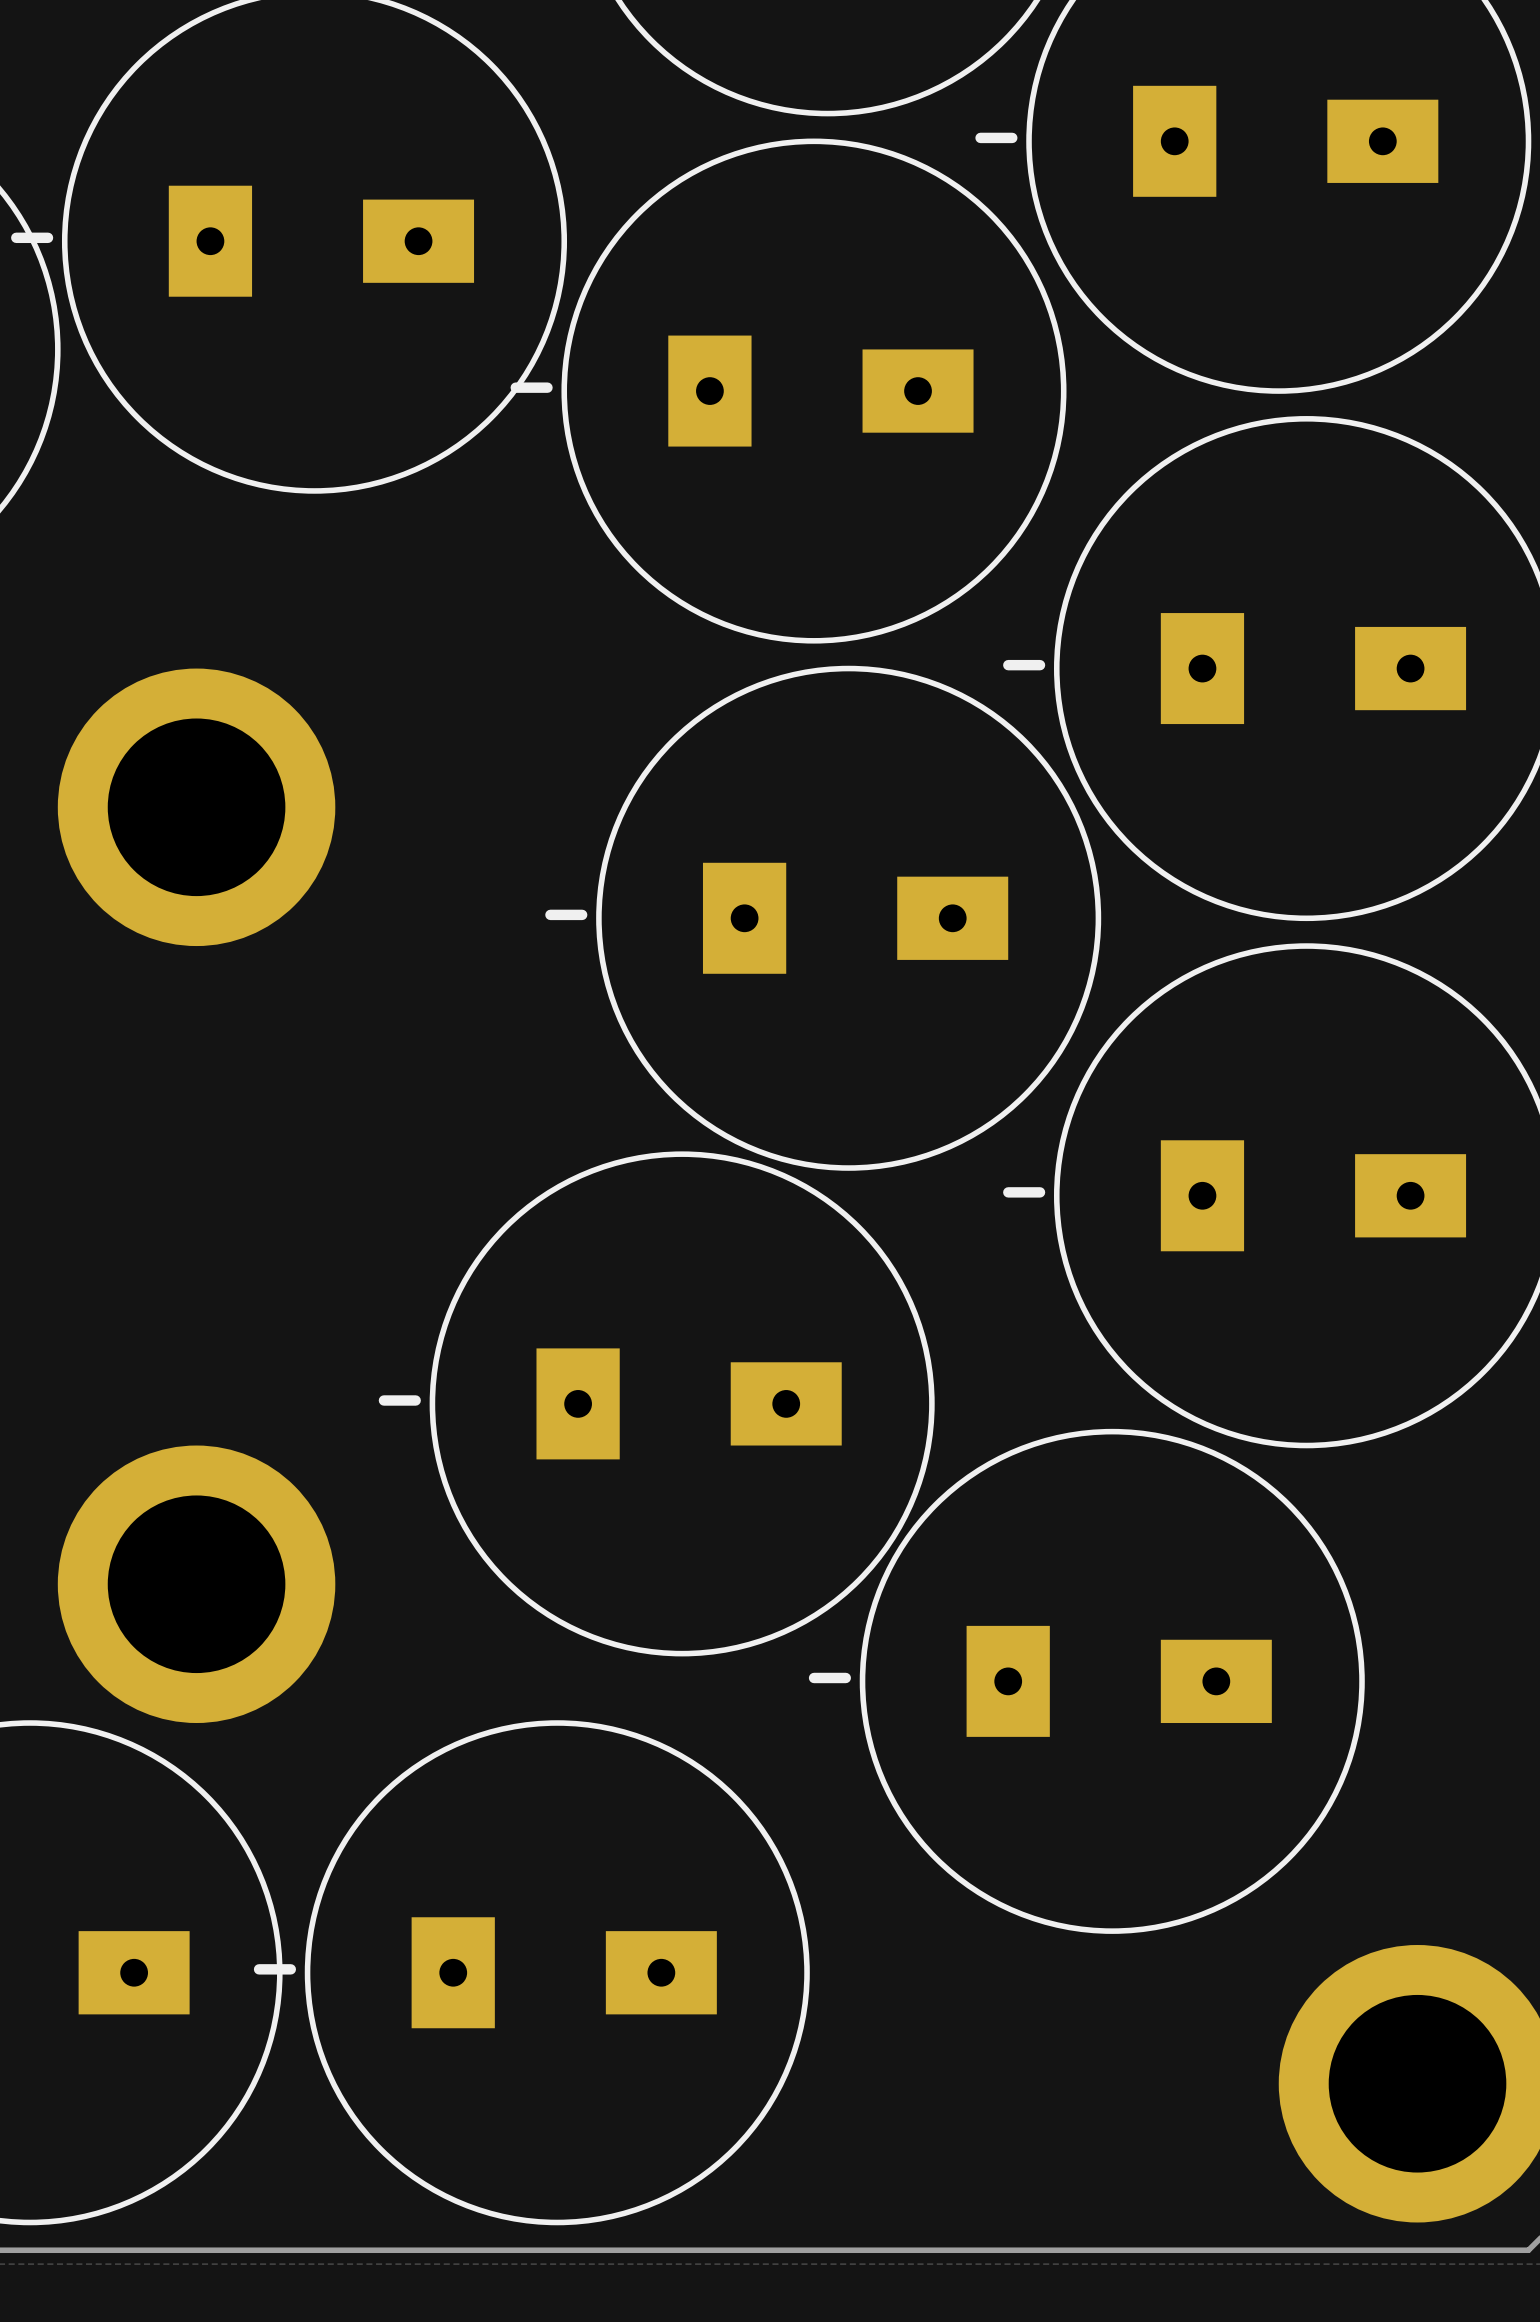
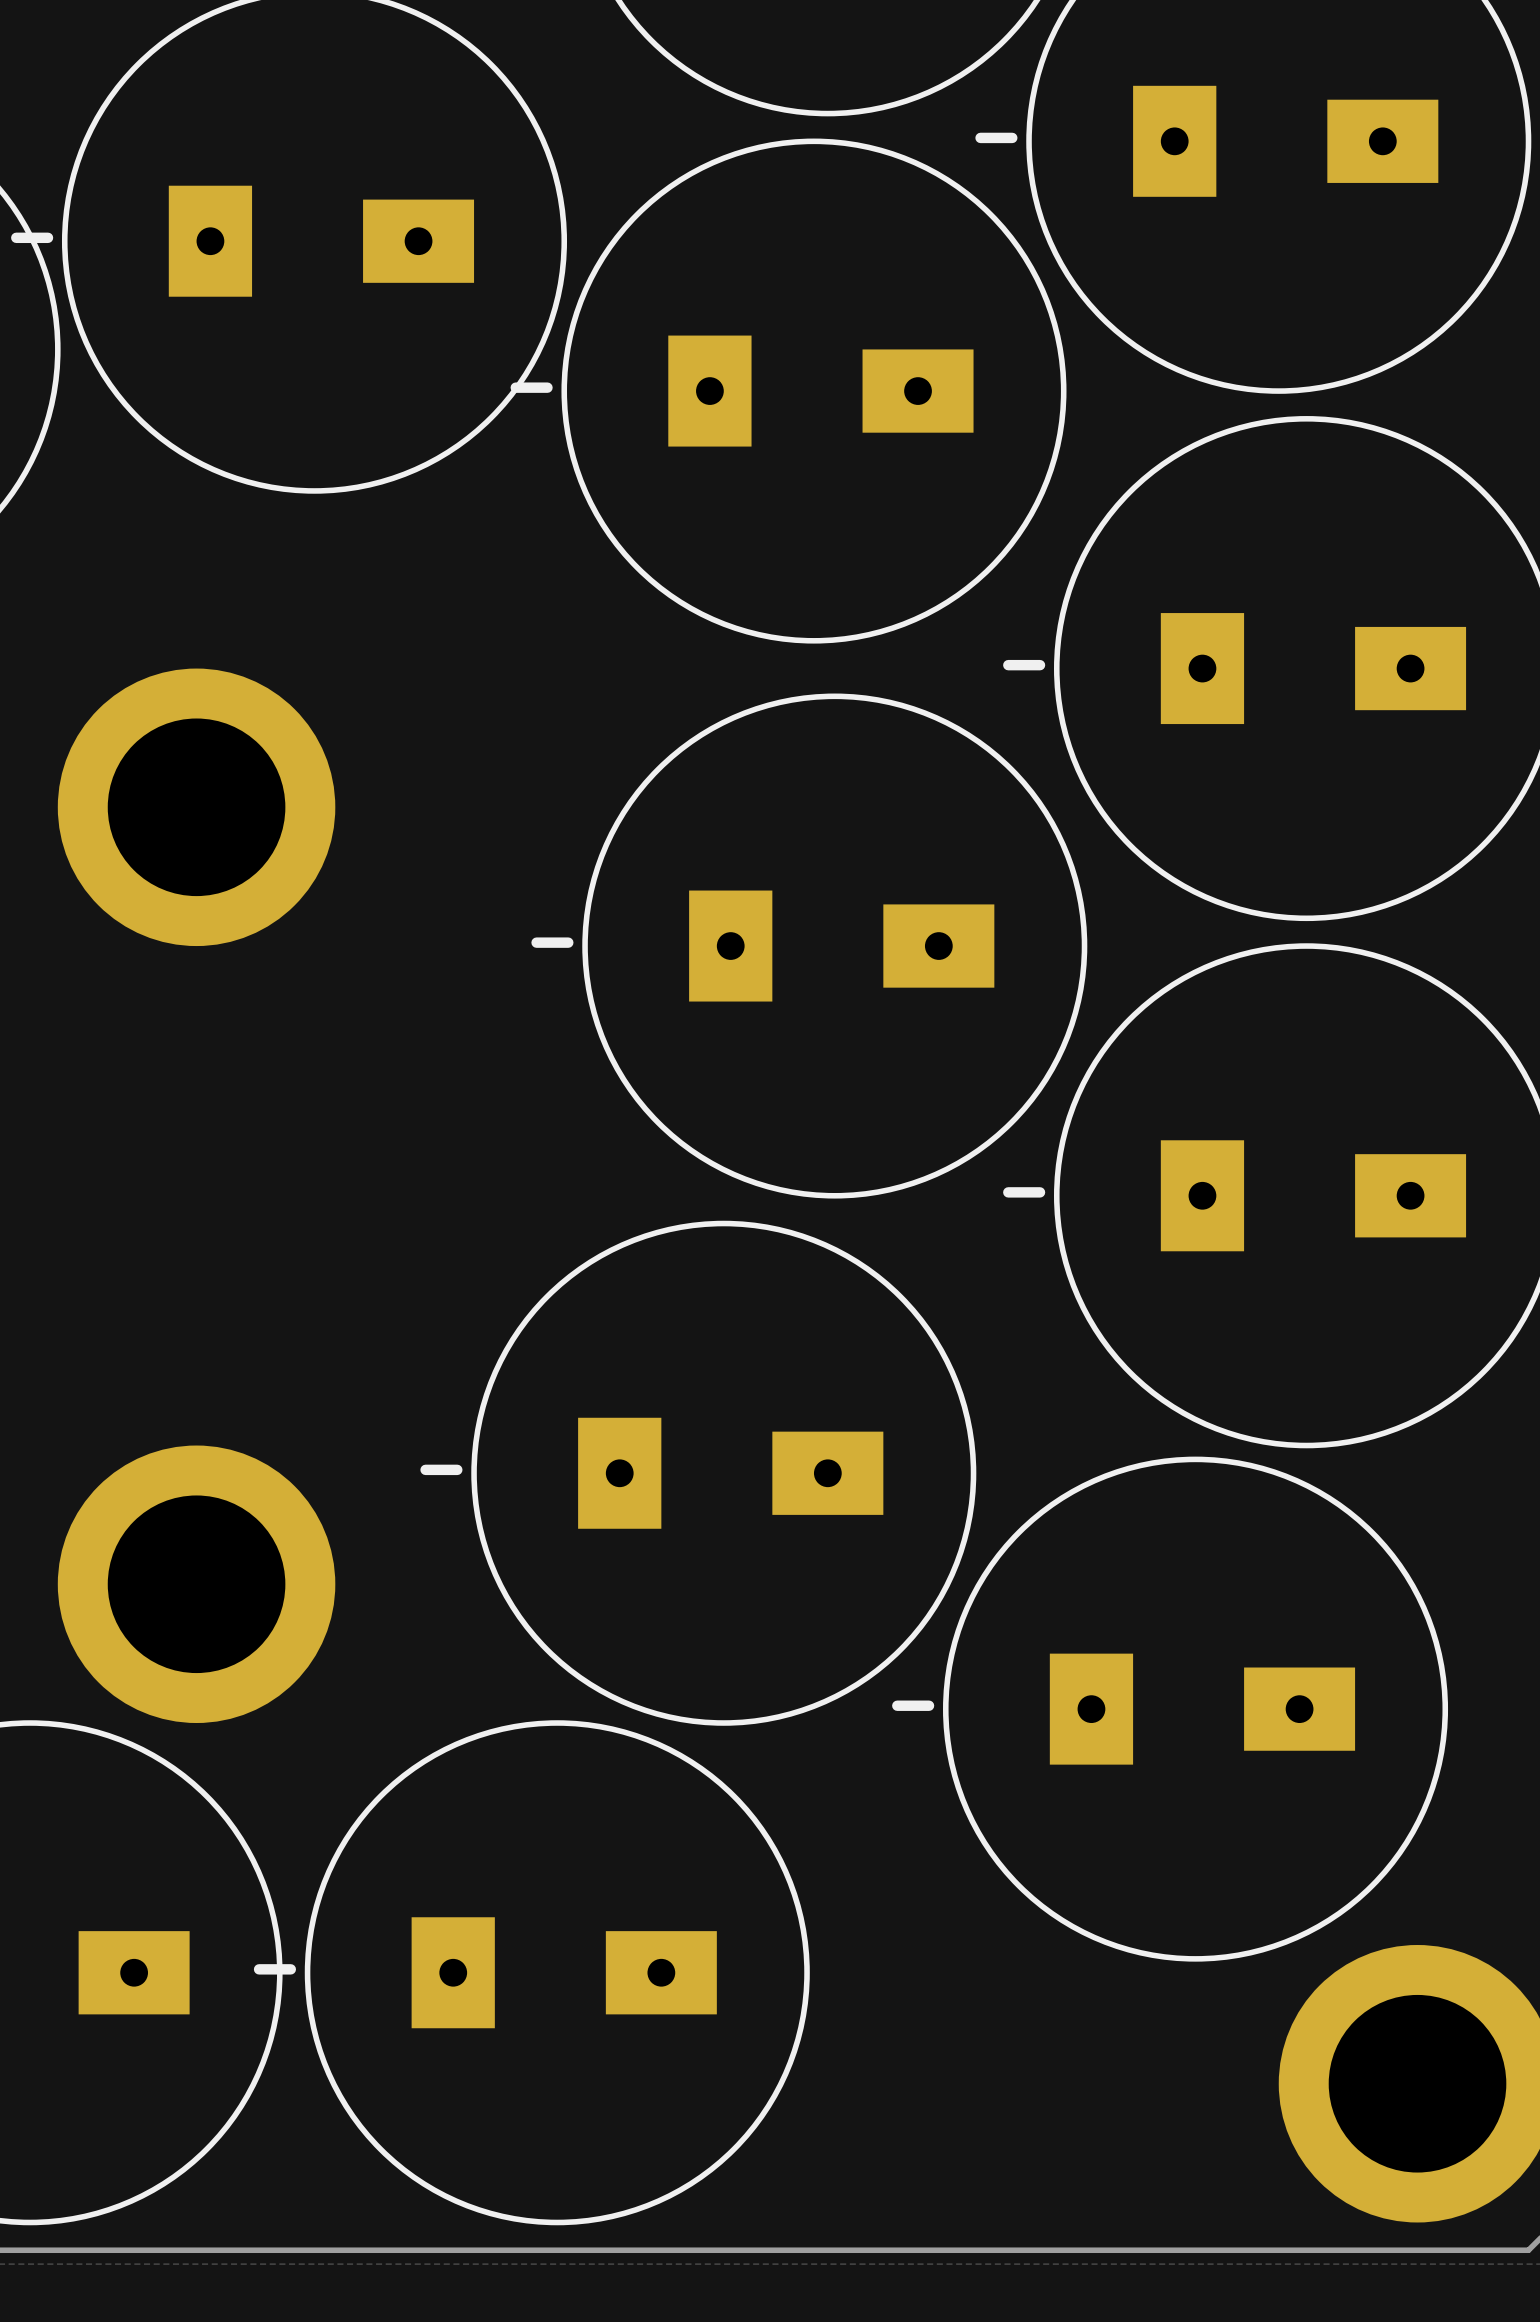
part position: (848, 918) -> (834, 946)
part position: (682, 1403) -> (723, 1473)
part position: (1112, 1681) -> (1195, 1709)

